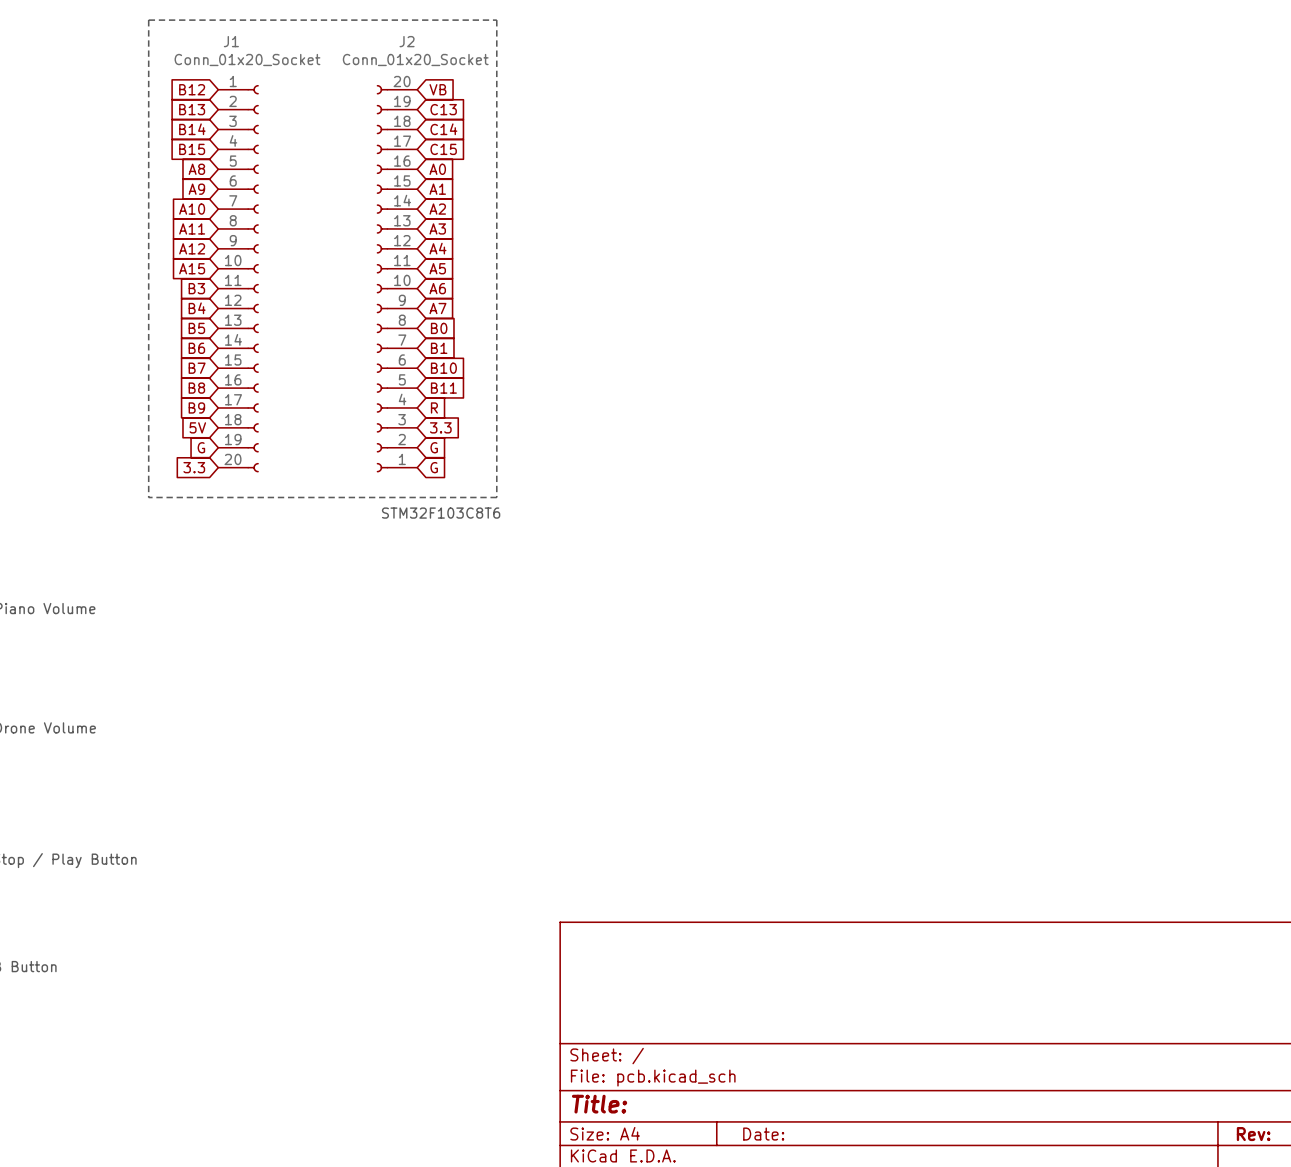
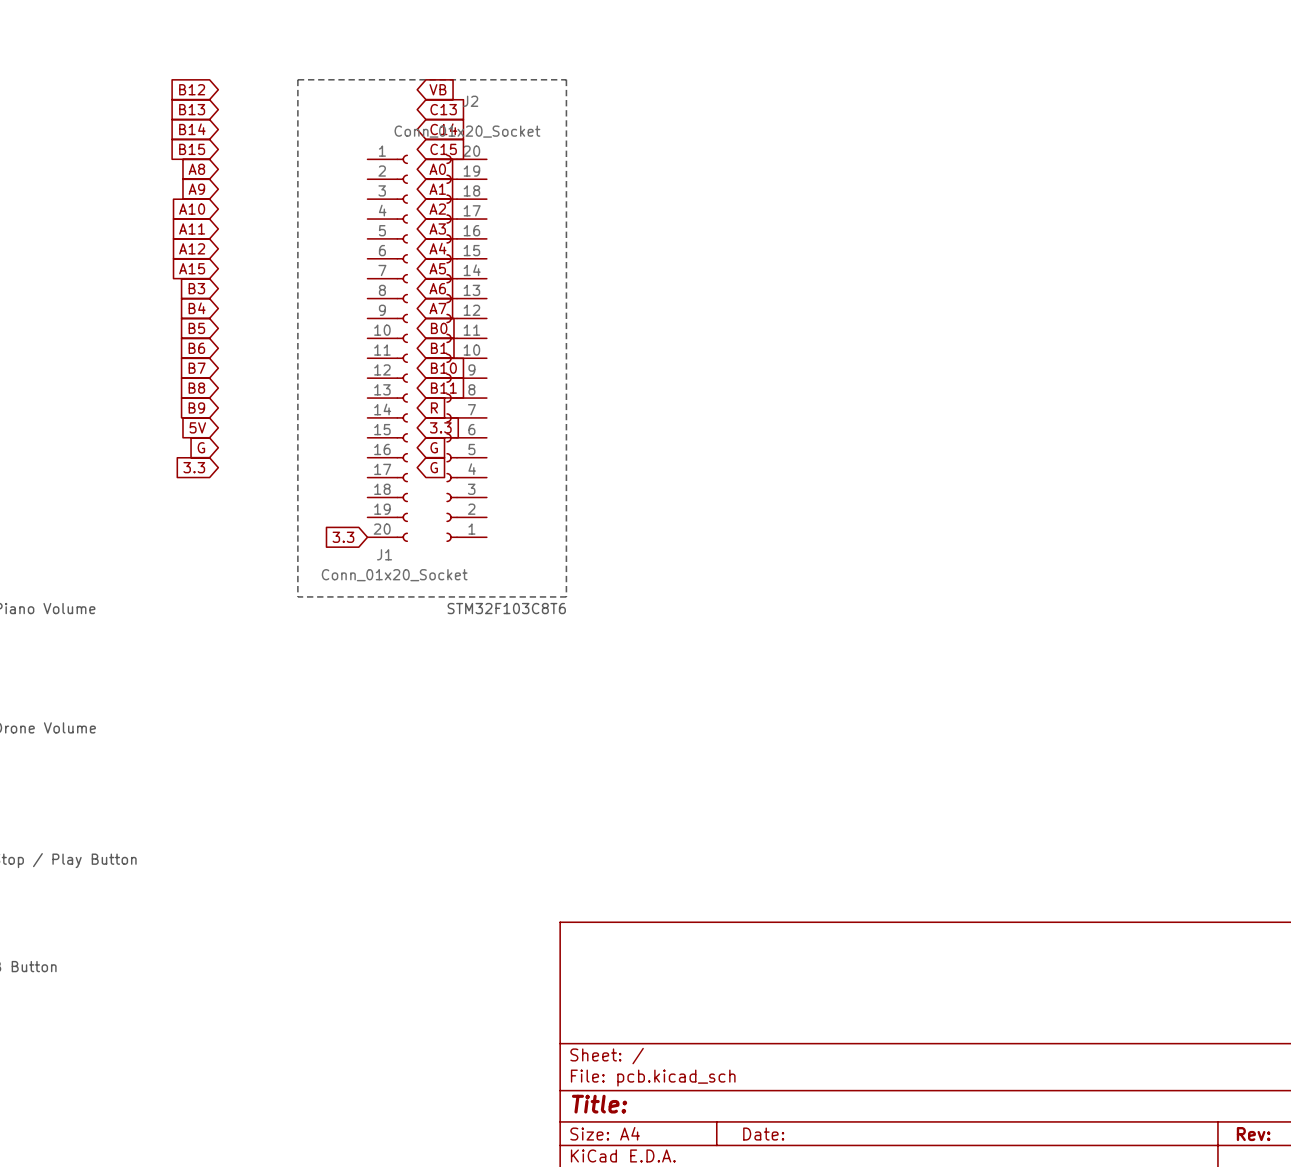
line: (148, 20) (148, 497) (496, 497) (496, 20) (148, 20) -> none
J1 name position: J1 (231, 41) -> J1 (384, 554)
J2 name position: J2 (407, 41) -> J2 (470, 101)
J1 value position: Conn_01x20_Socket (247, 59) -> Conn_01x20_Socket (394, 575)
J2 value position: Conn_01x20_Socket (415, 59) -> Conn_01x20_Socket (467, 131)
line: none -> (297, 79) (297, 596) (566, 596) (566, 79) (297, 79)
J1 position: (238, 278) -> (387, 348)
J2 position: (397, 278) -> (466, 348)
text position: STM32F103C8T6 (441, 513) -> STM32F103C8T6 (506, 608)
global label: none -> 3.3 (343, 537)

